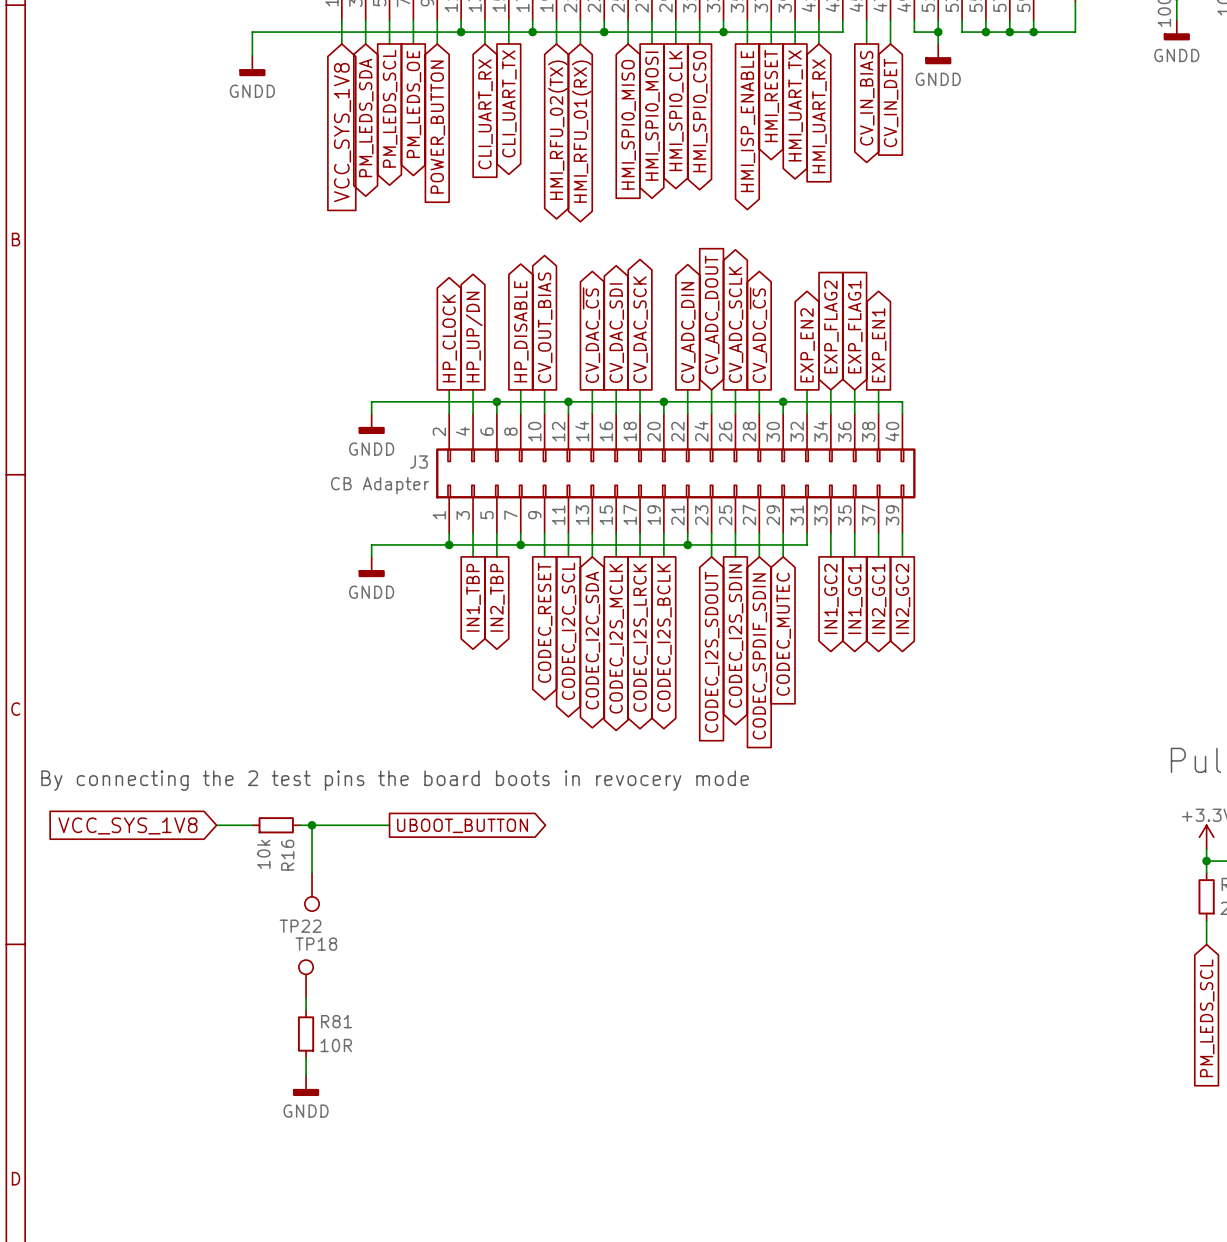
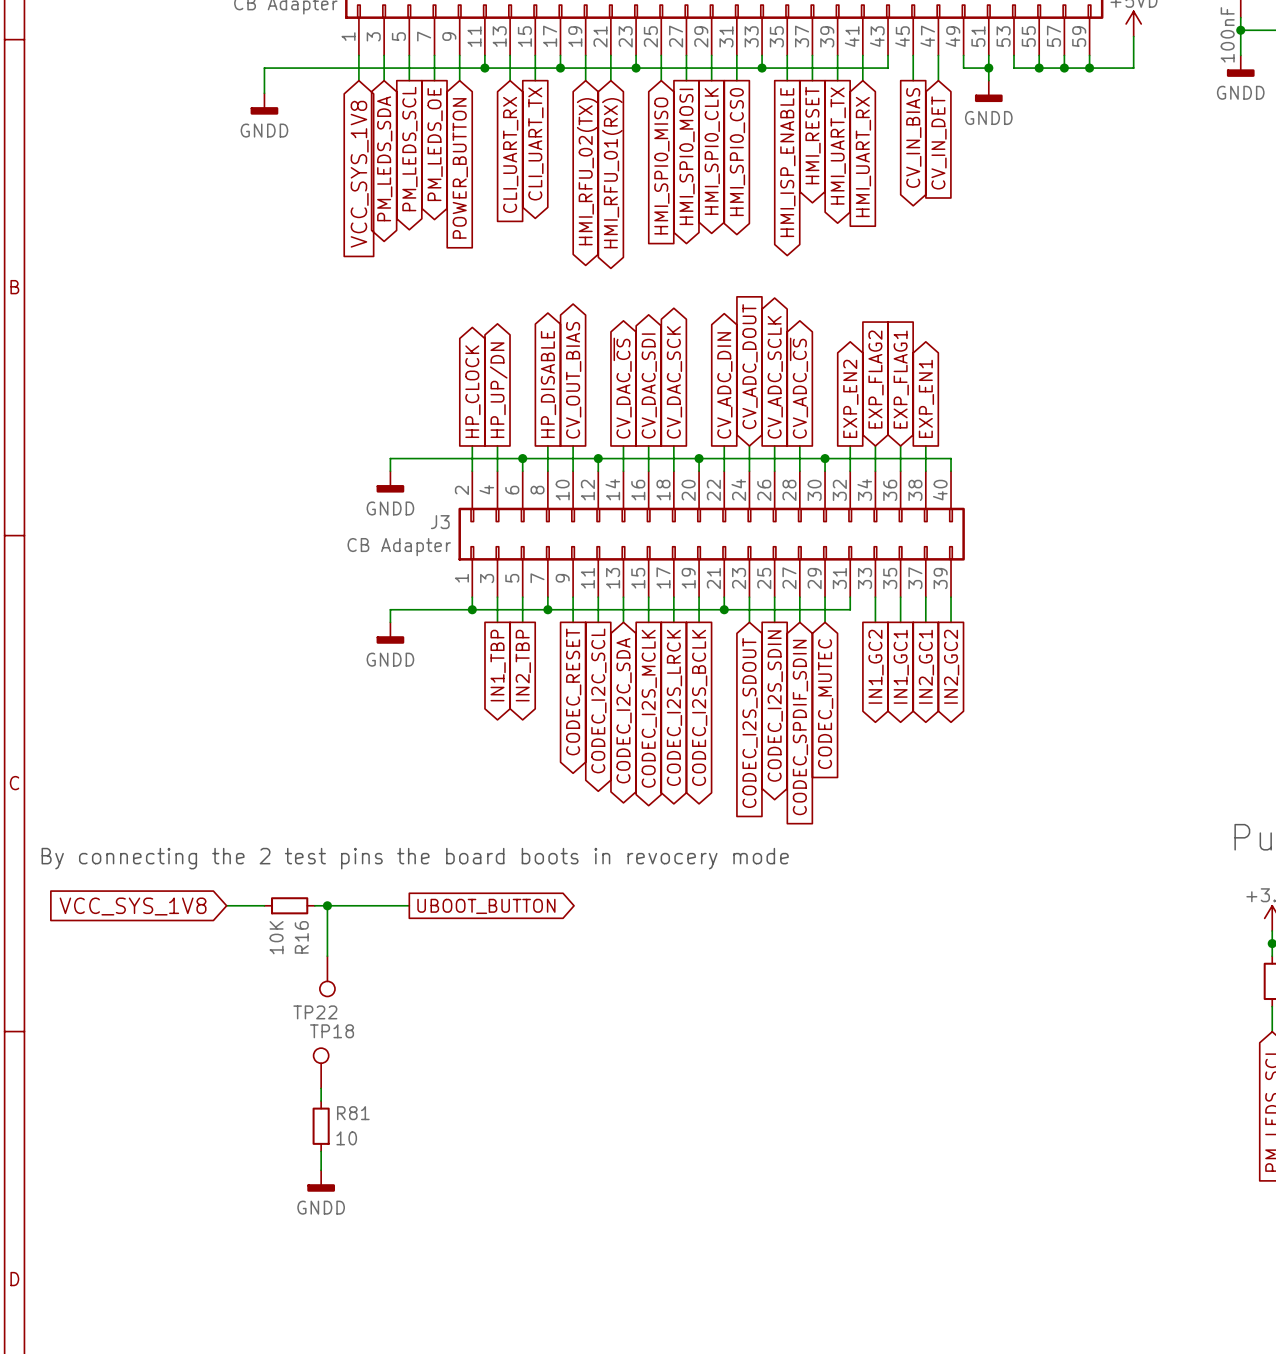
R16 value: 10k (263, 854) -> 10K (276, 937)
R81 value: 10R (336, 1045) -> 10 (346, 1138)

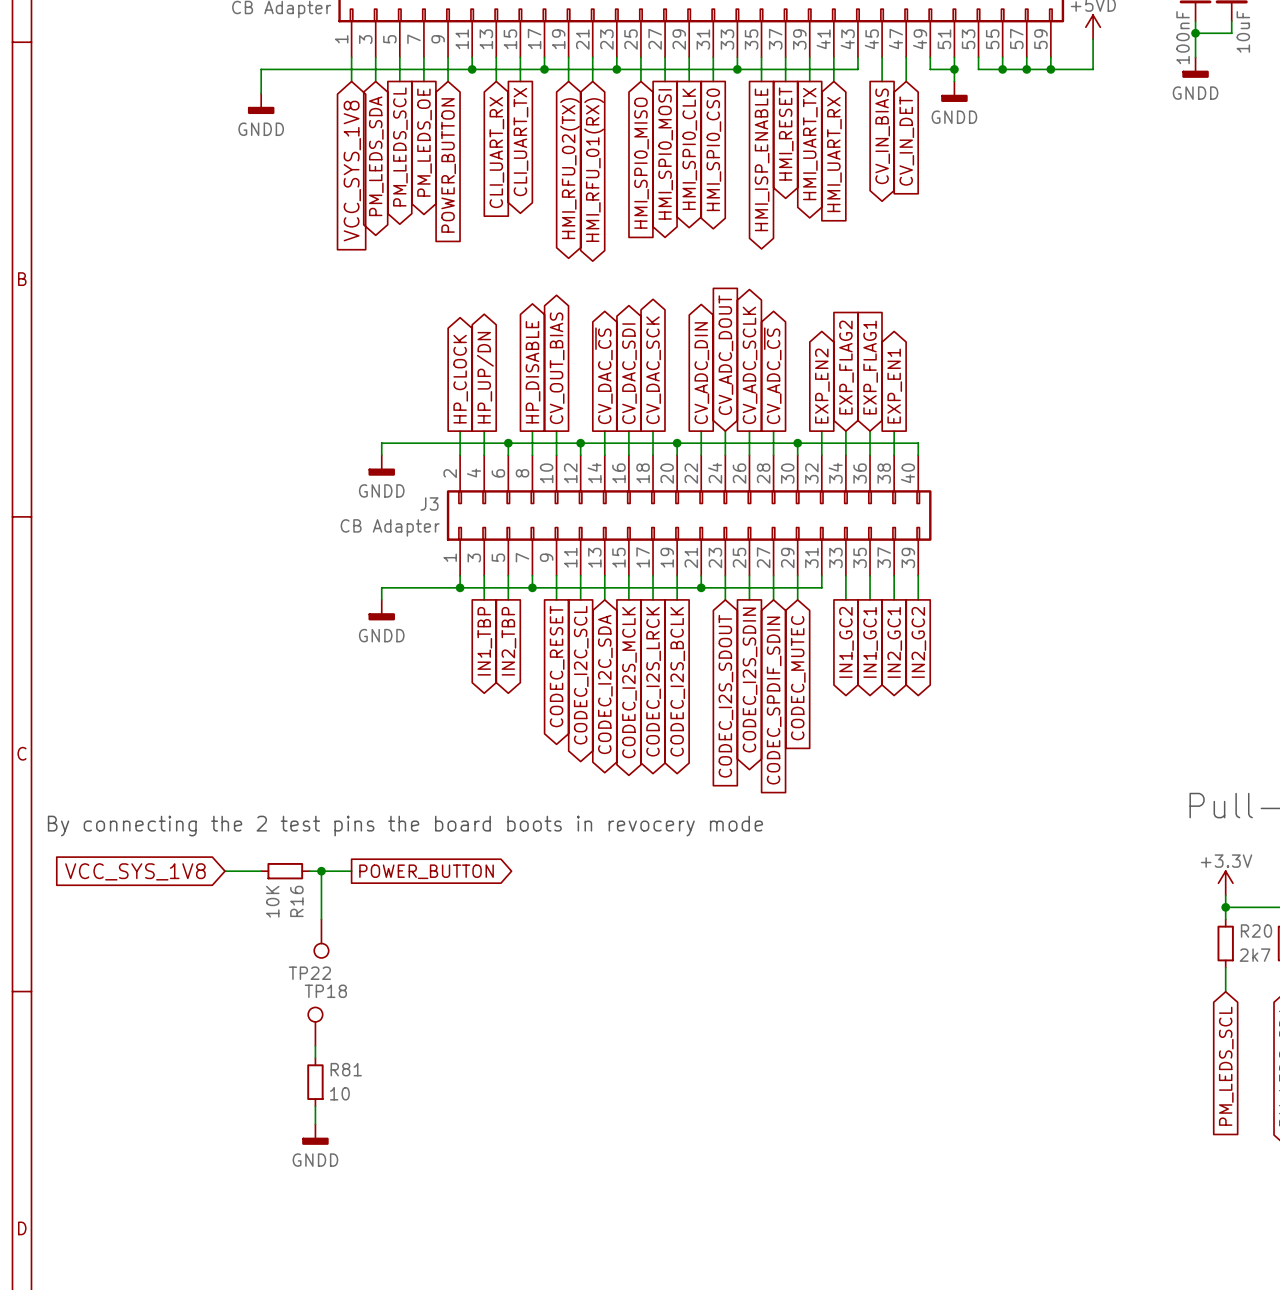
wire: (358, 905) (409, 905) -> none
global label: UBOOT_BUTTON (486, 906) -> POWER_BUTTON (426, 871)

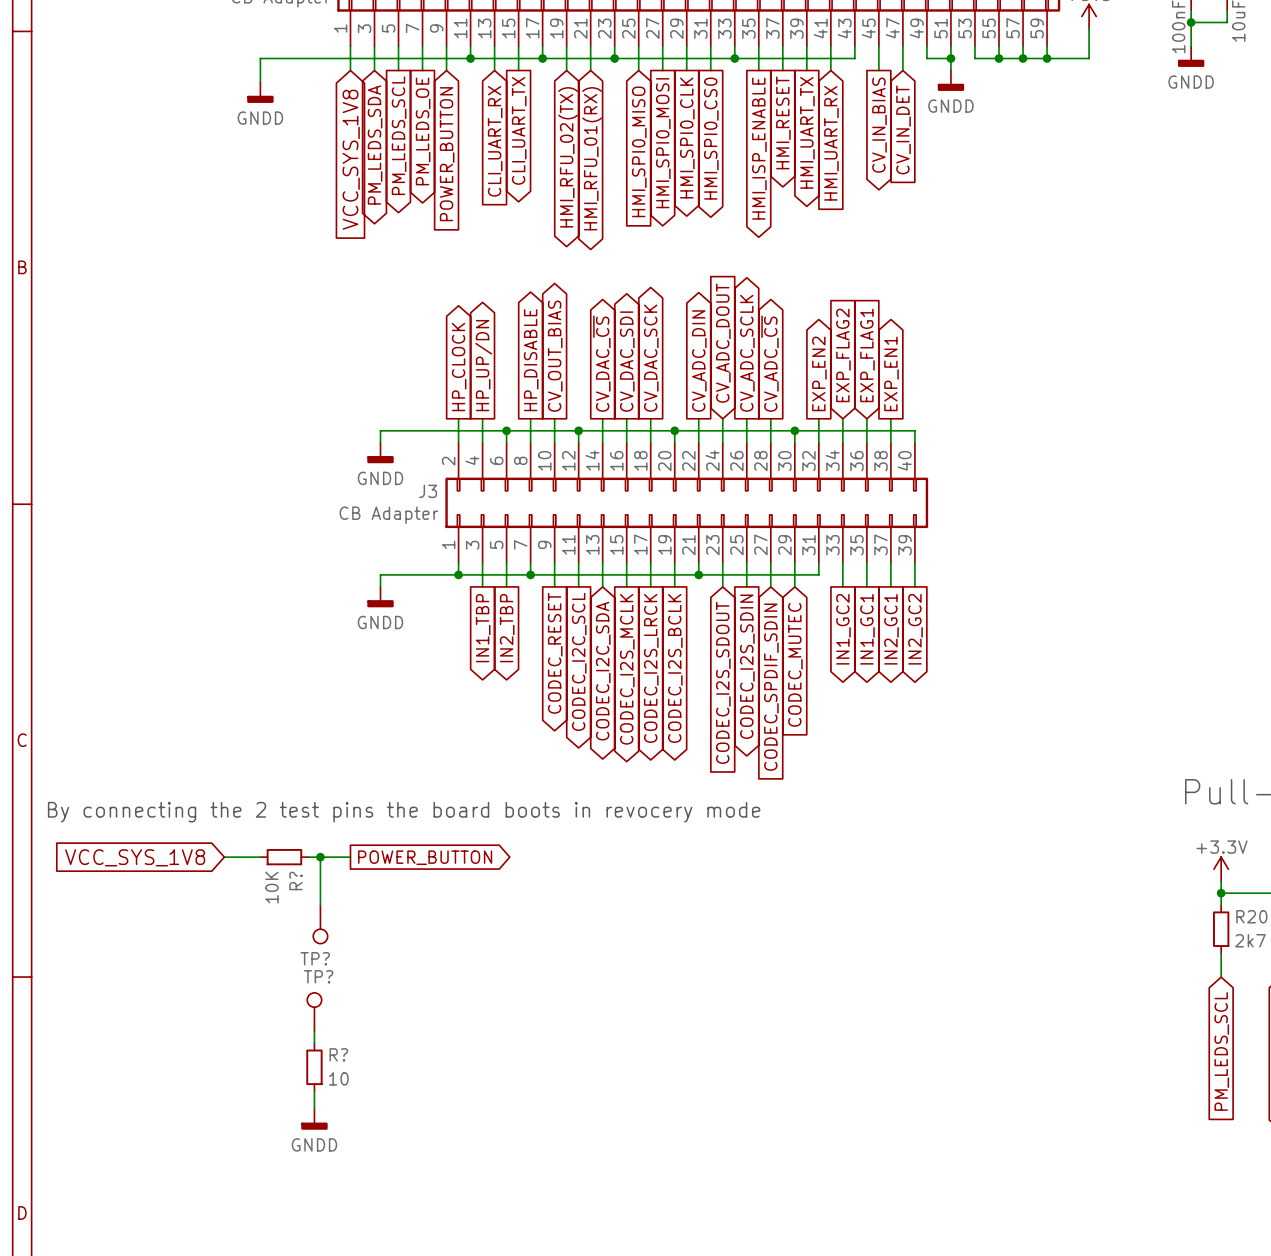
R16 name: R16 (296, 901) -> R? (295, 880)
TP22 name: TP22 (309, 973) -> TP? (315, 958)
TP18 name: TP18 (325, 991) -> TP? (318, 976)
R81 name: R81 (346, 1069) -> R? (338, 1054)

